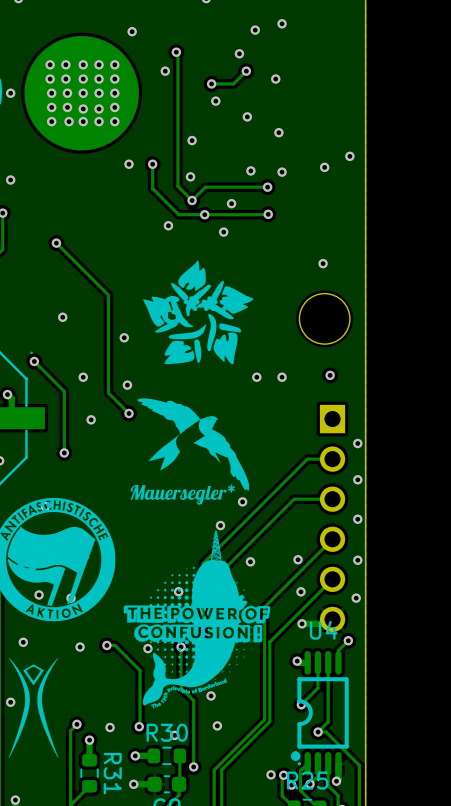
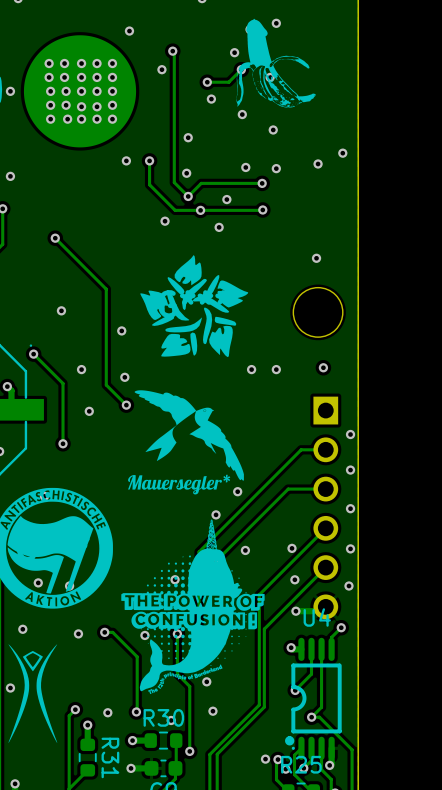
drawing: none -> [236, 18, 316, 108]

